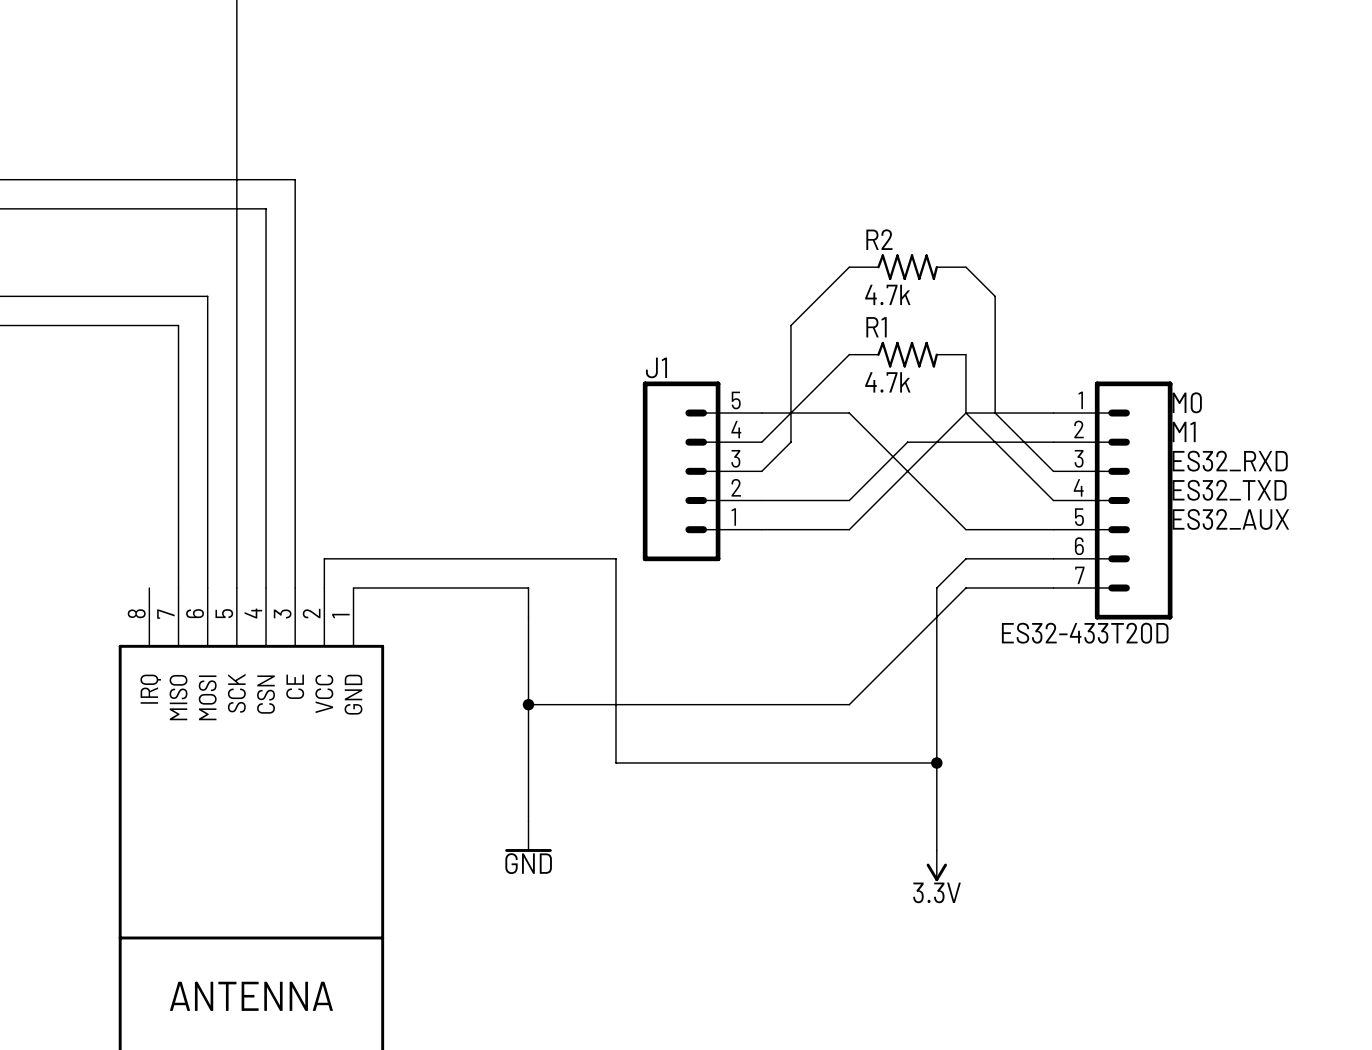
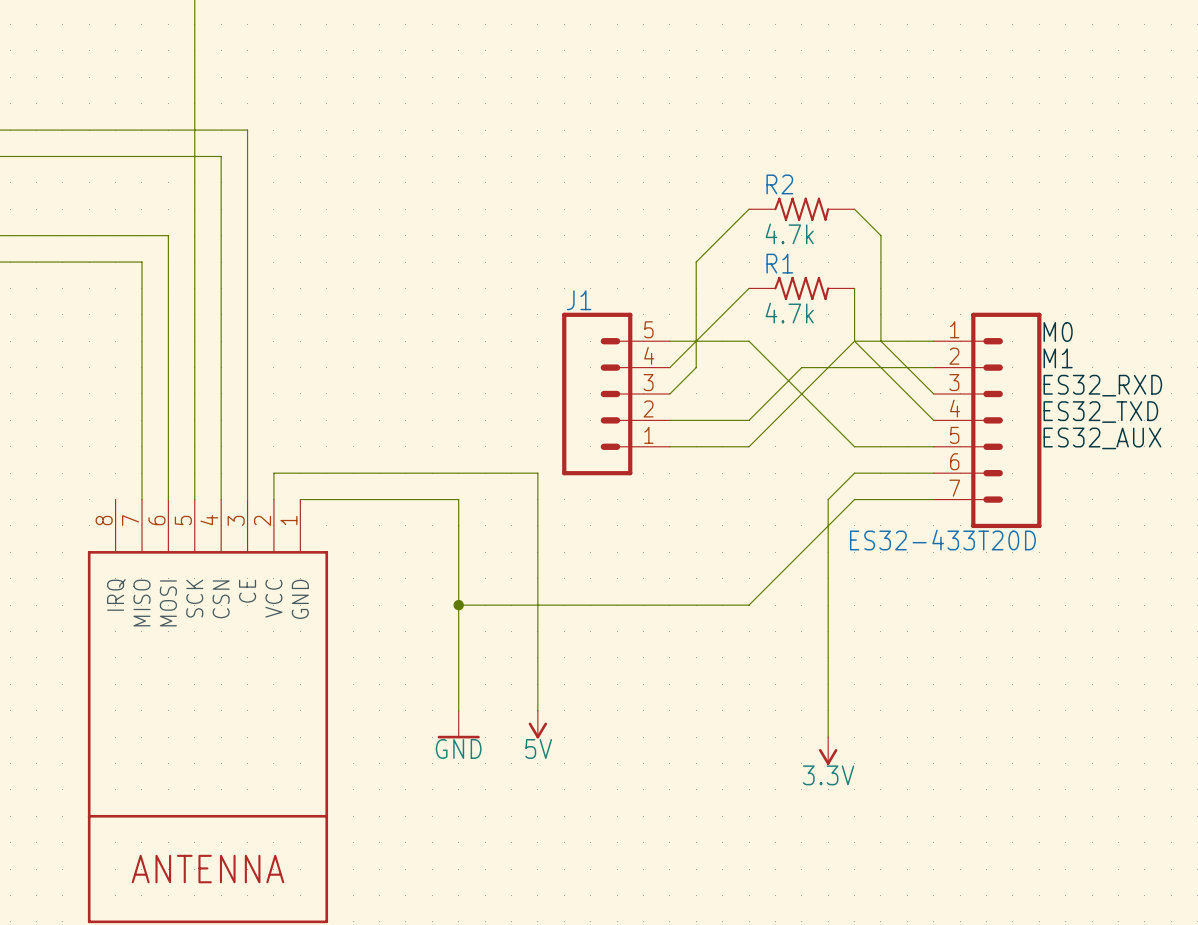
wire: (615, 762) (936, 762) -> (537, 657) (537, 710)
junction: (936, 762) -> none
power symbol: none -> 5V (537, 724)

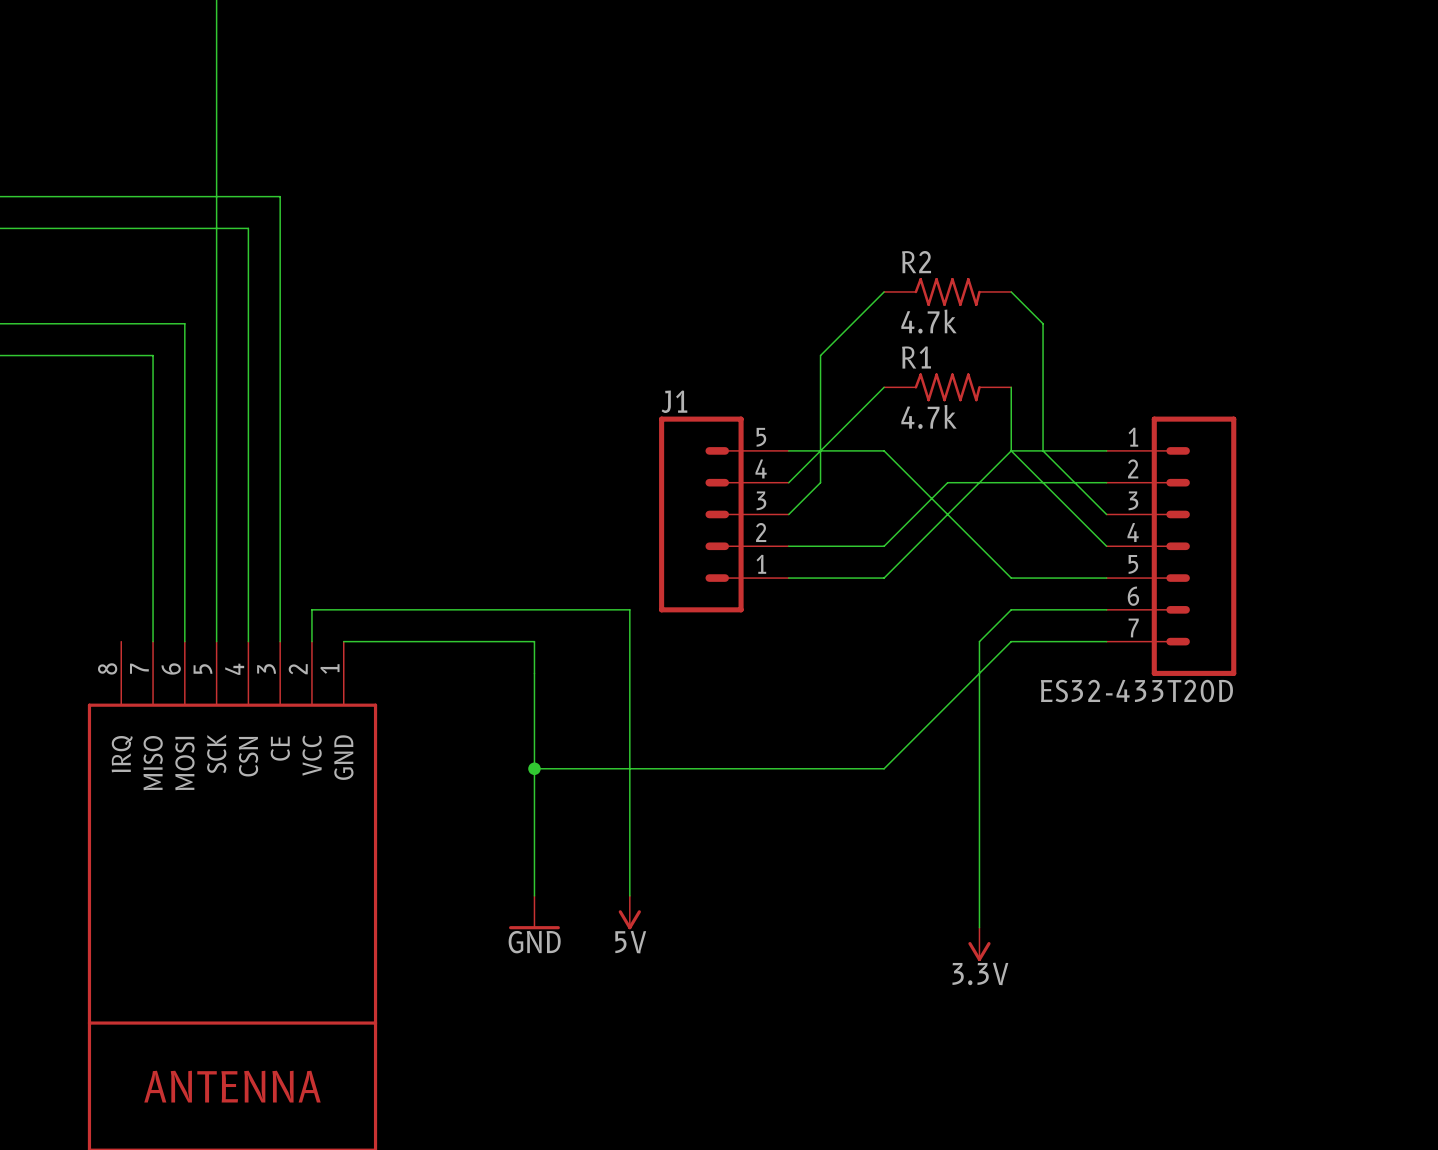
label: M0 (1058, 331) -> none
label: M1 (1058, 358) -> none
label: ES32_RXD (1102, 385) -> none
label: ES32_TXD (1100, 412) -> none
label: ES32_AUX (1102, 438) -> none

